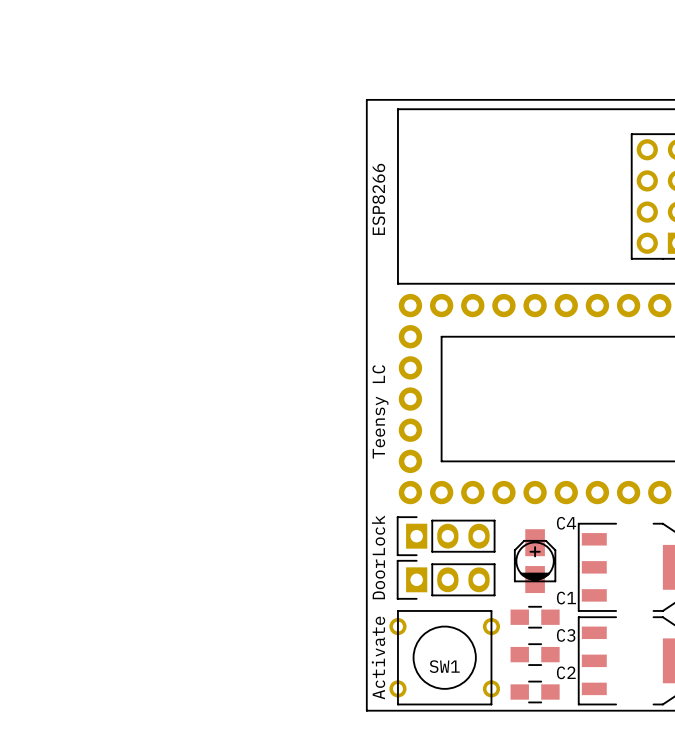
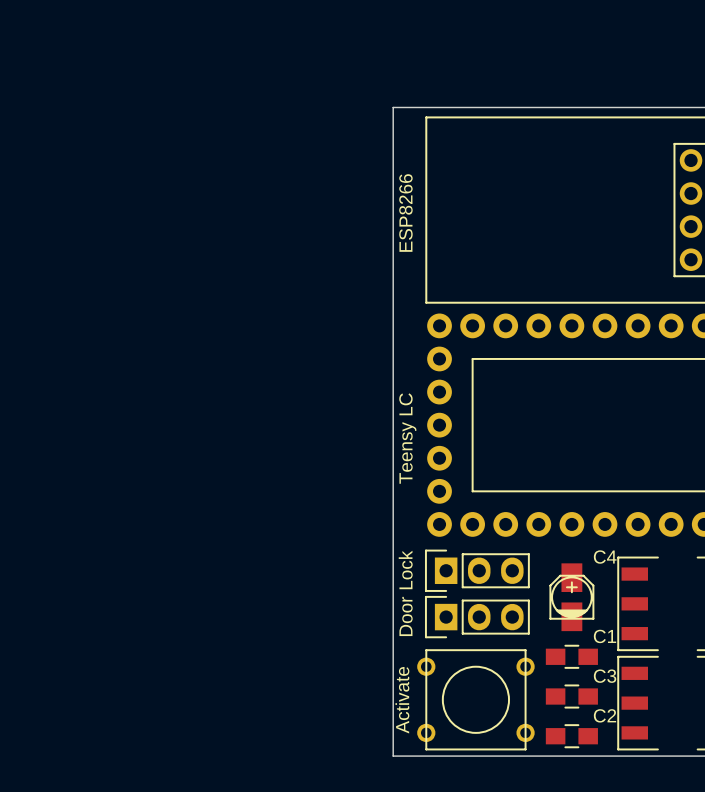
SW1 value: Activate (378, 658) -> none
SW1 name: SW1 (444, 666) -> Activate (402, 700)

